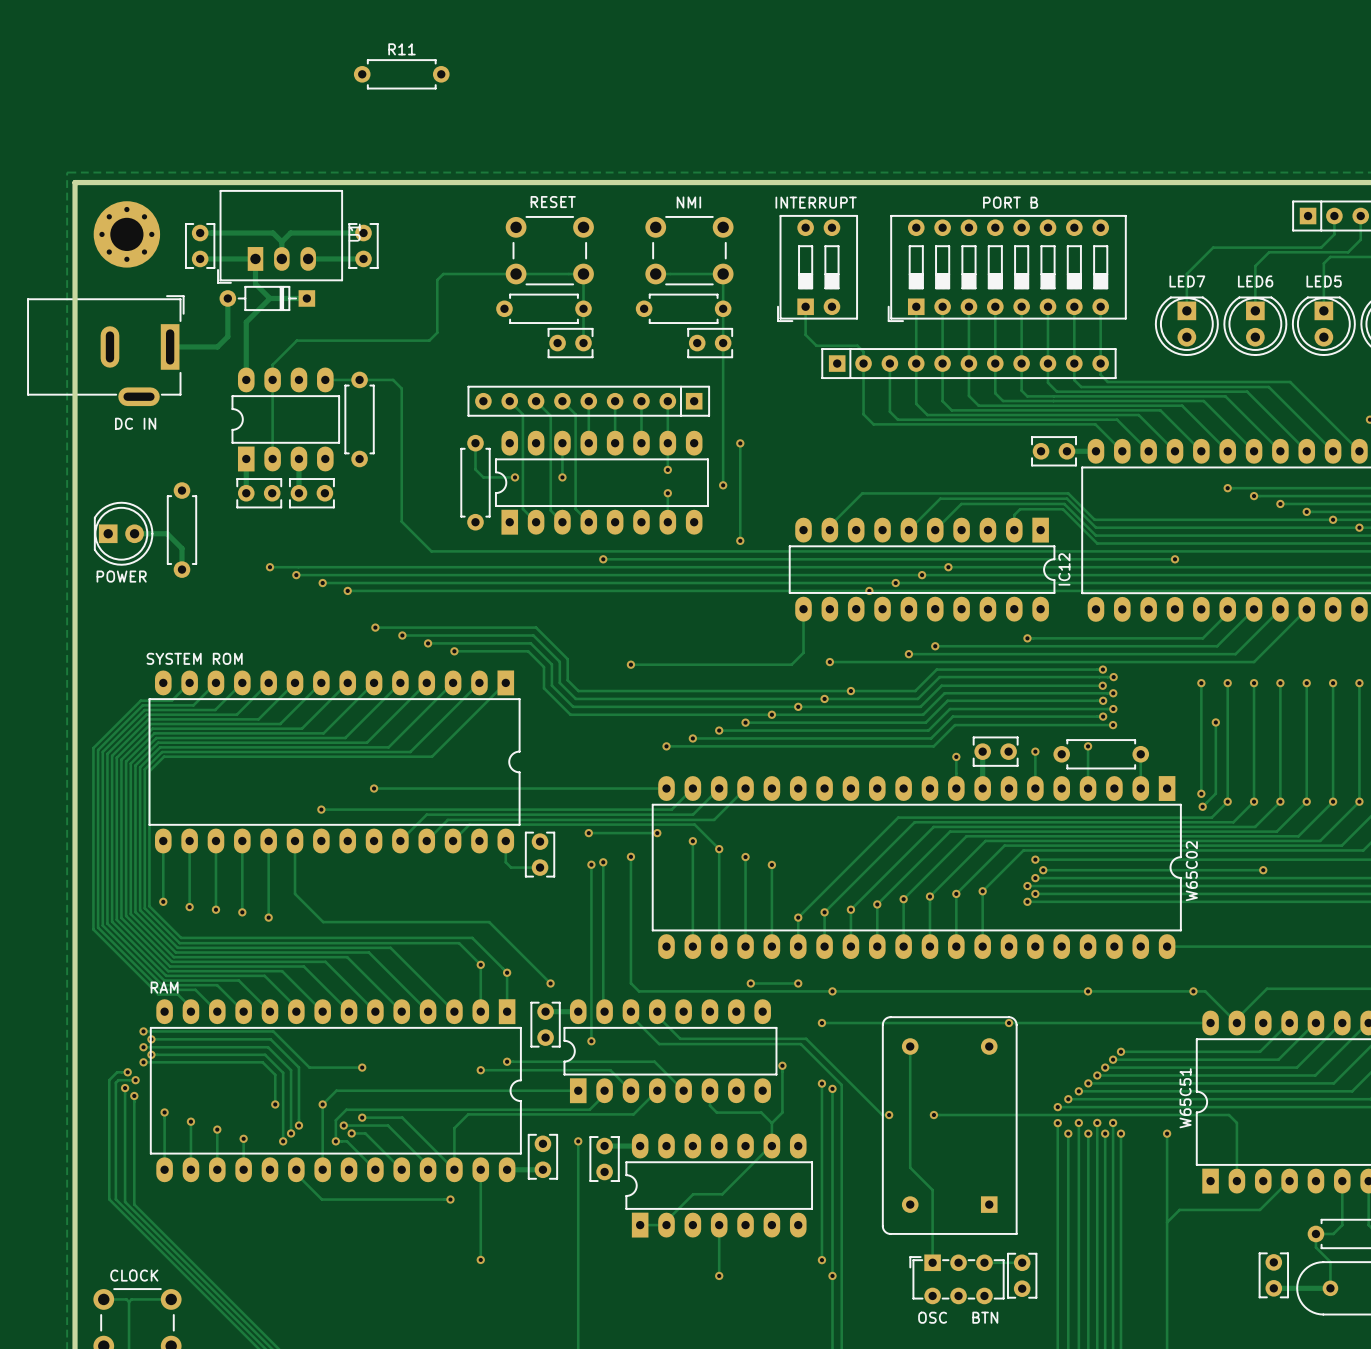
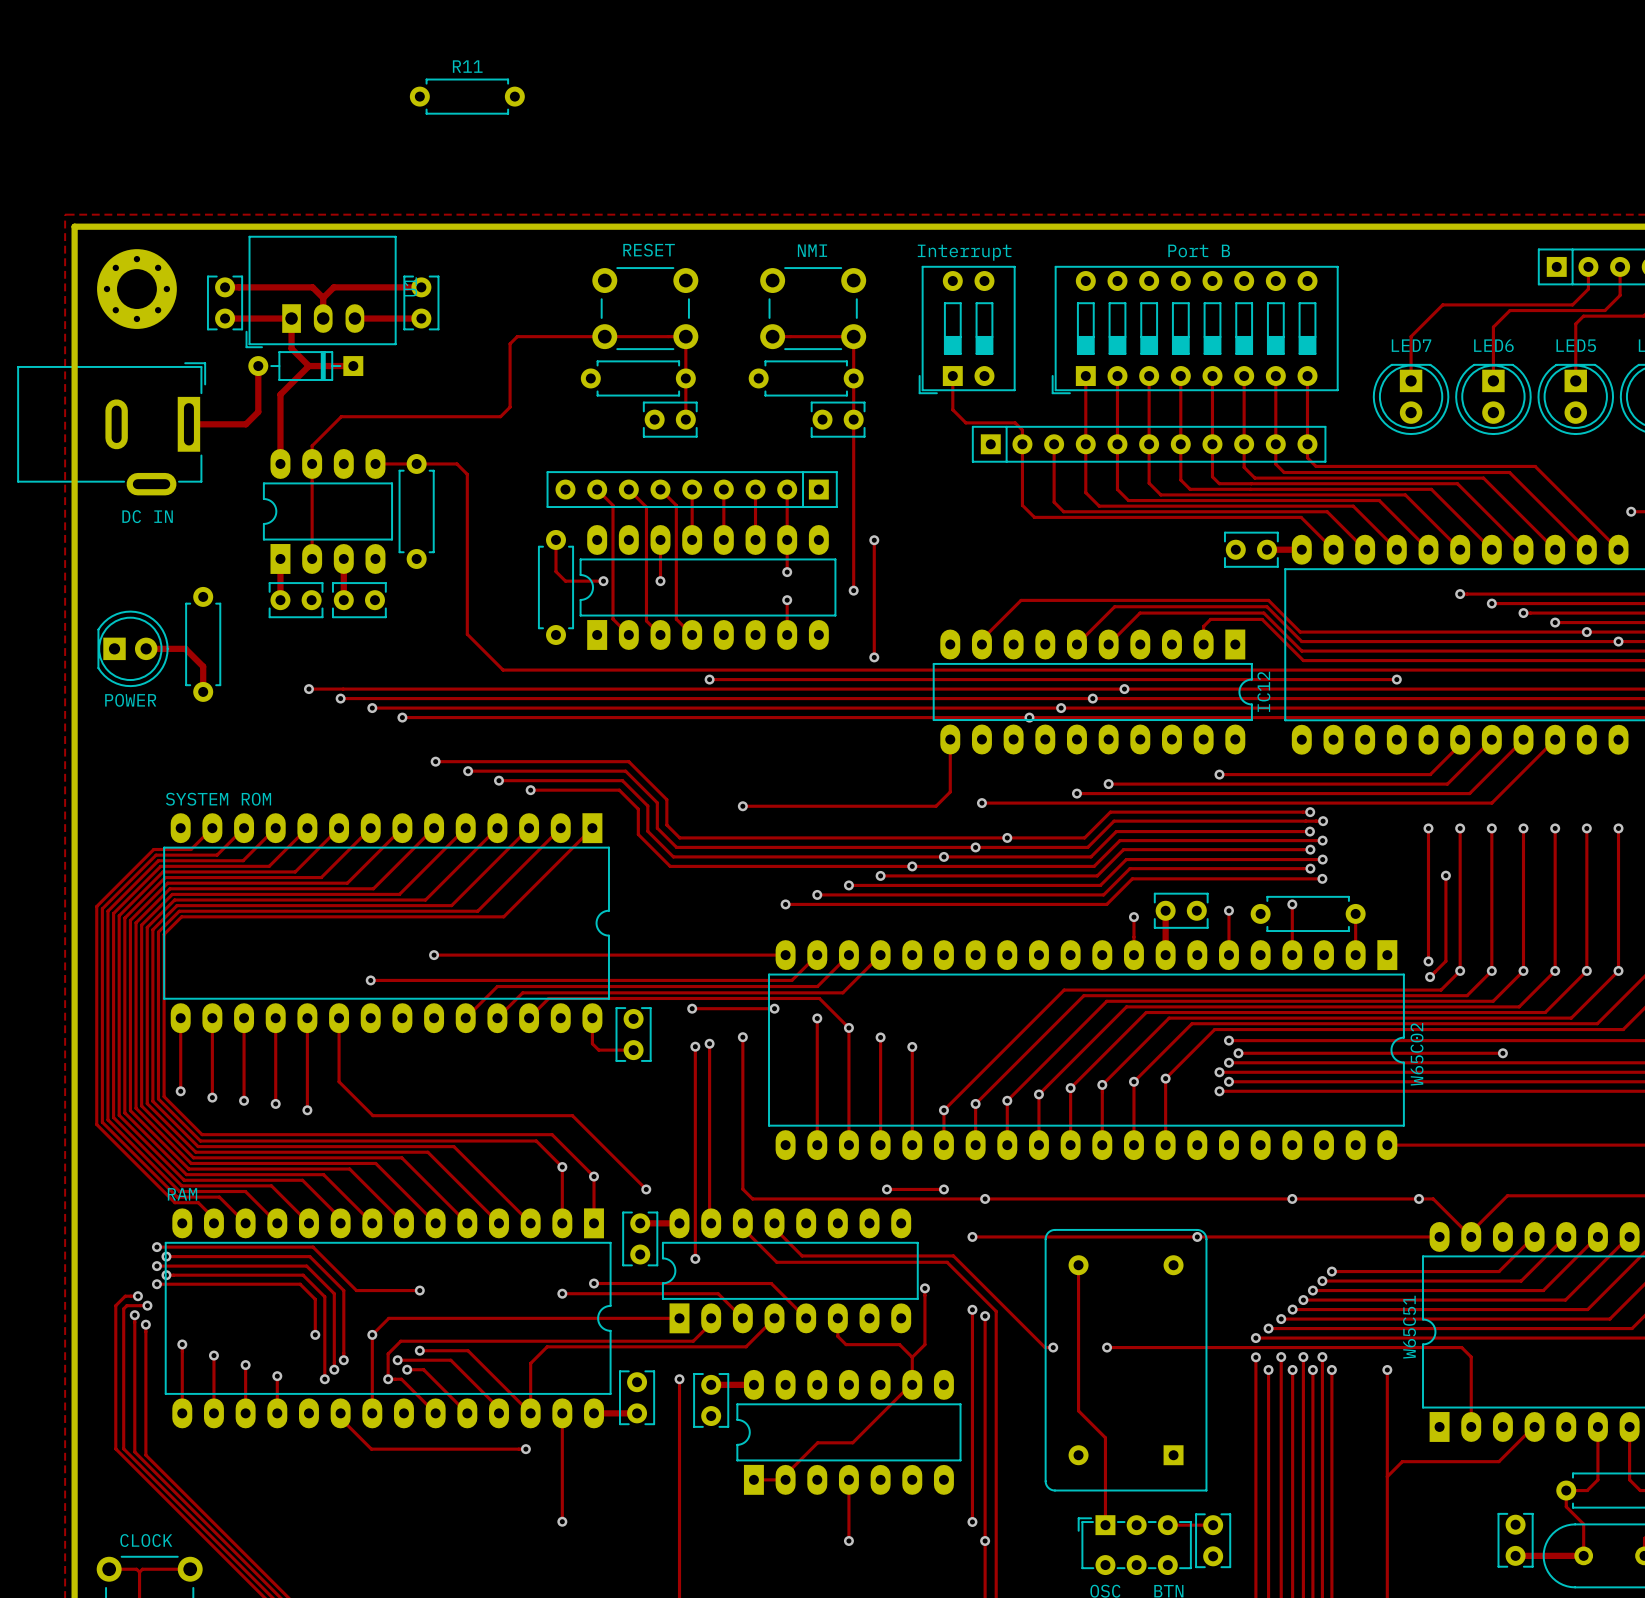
part value: INTERRUPT (816, 202) -> Interrupt (964, 252)
part value: PORT B (1010, 202) -> Port B (1199, 250)

